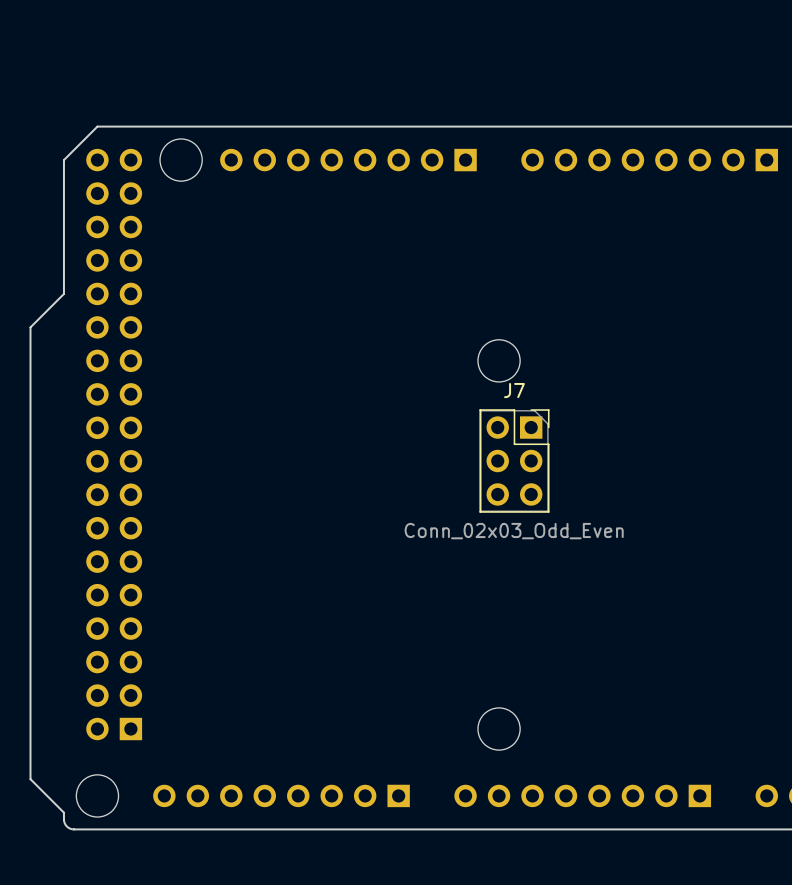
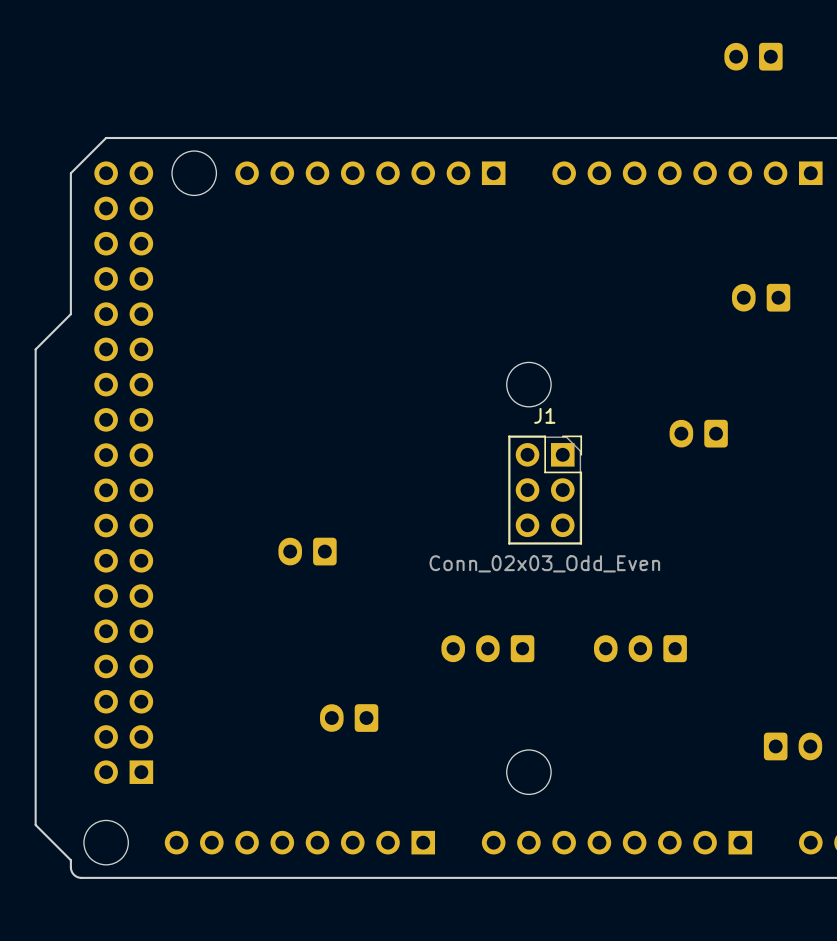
part: none -> (753, 56)
part: none -> (761, 297)
J7 name: J7 (514, 390) -> J1 (544, 415)
part: none -> (698, 433)
part: none -> (307, 551)
part: none -> (487, 648)
part: none -> (640, 648)
part: none -> (349, 718)
part: none -> (793, 746)

